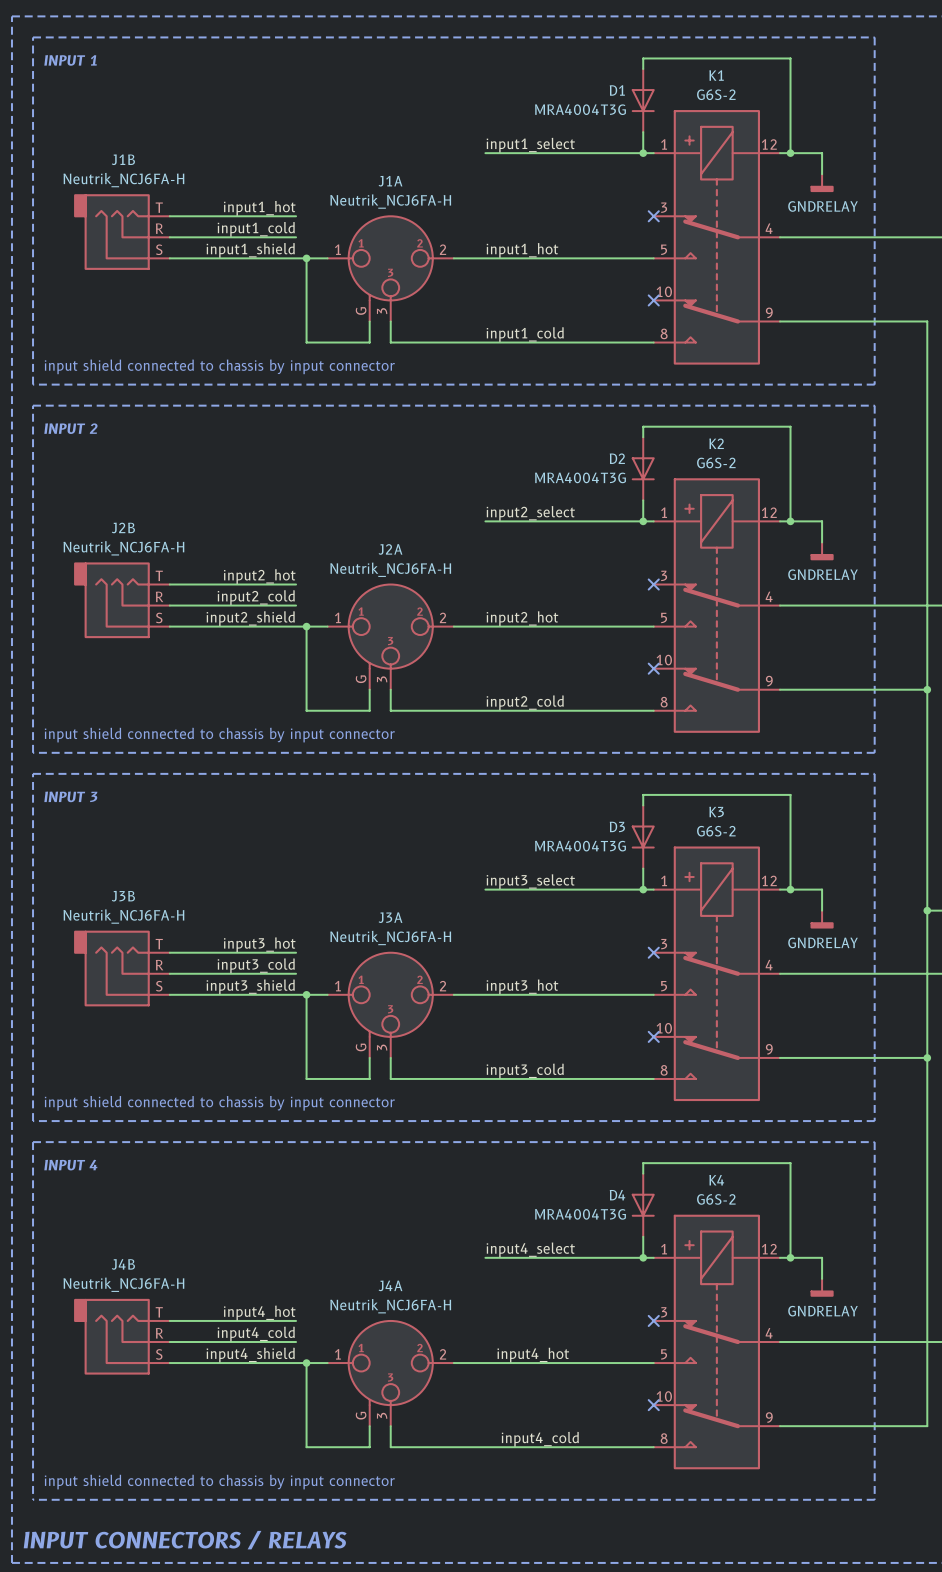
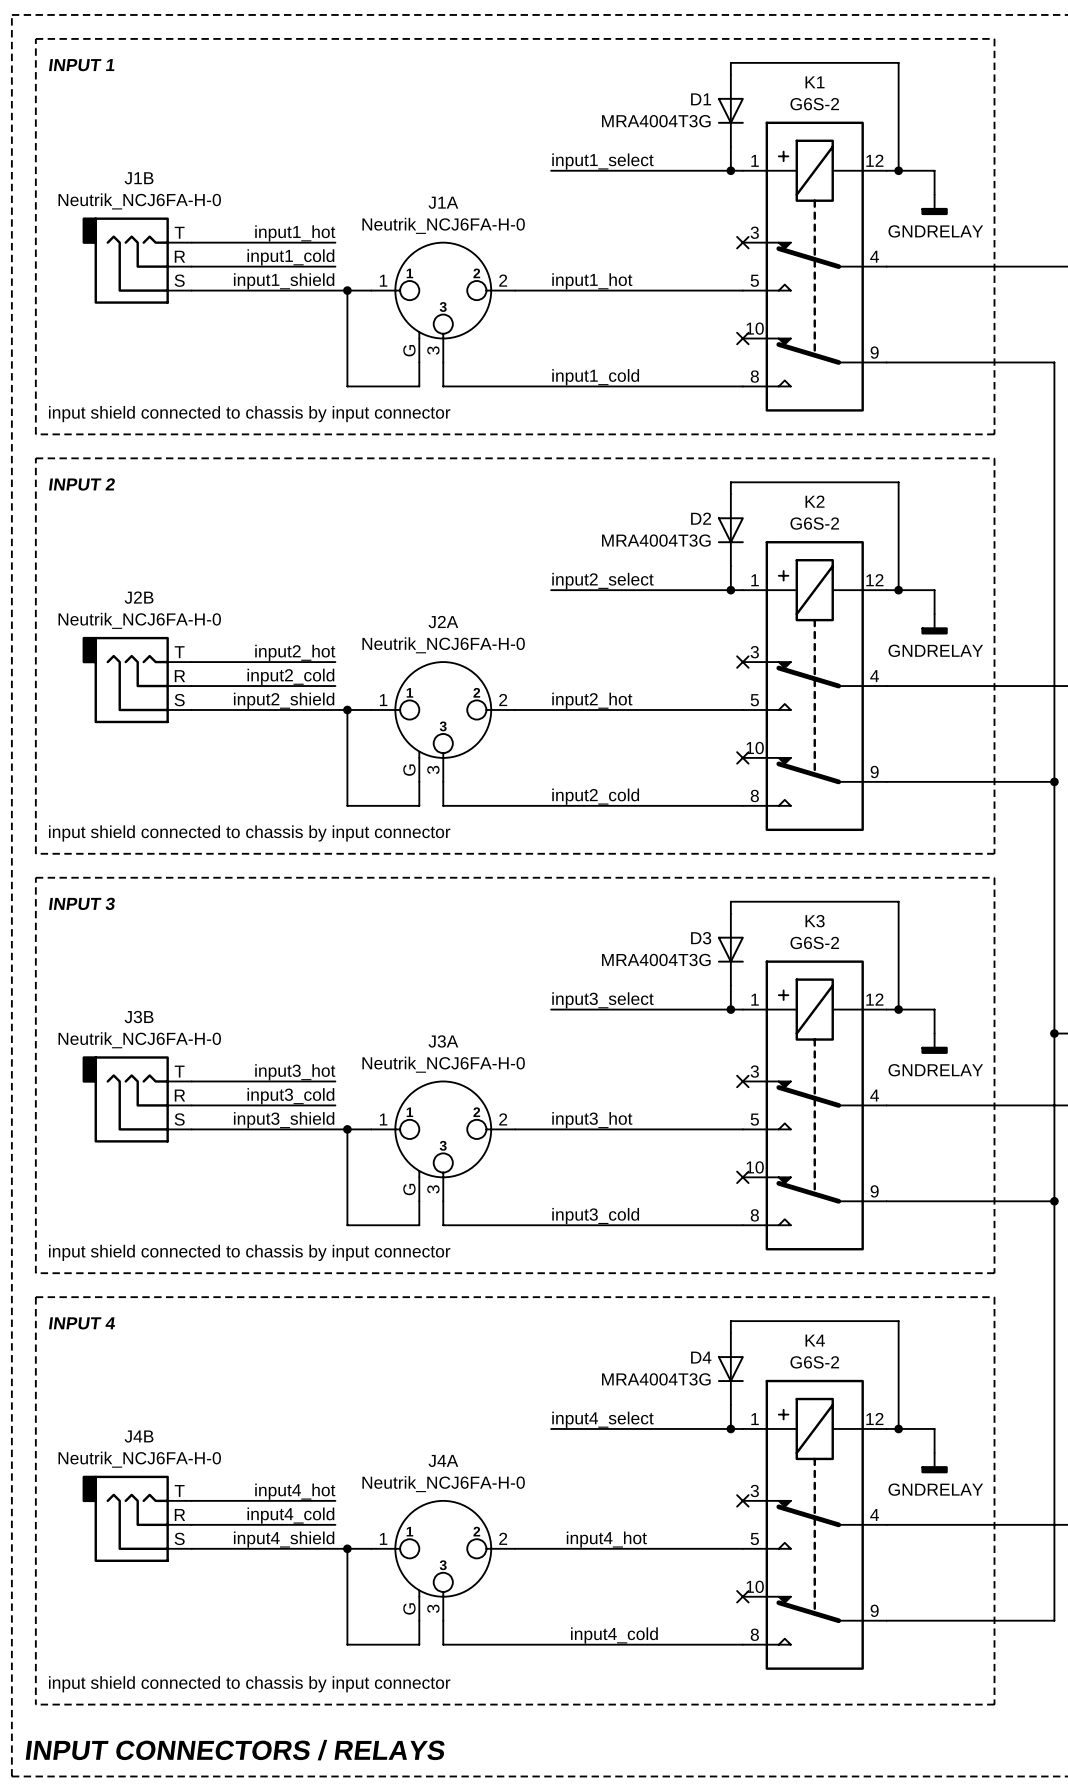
J1B value: Neutrik_NCJ6FA-H (123, 180) -> Neutrik_NCJ6FA-H-0 (139, 201)
J1A value: Neutrik_NCJ6FA-H (390, 201) -> Neutrik_NCJ6FA-H-0 (443, 225)
J2B value: Neutrik_NCJ6FA-H (123, 548) -> Neutrik_NCJ6FA-H-0 (139, 620)
J2A value: Neutrik_NCJ6FA-H (390, 569) -> Neutrik_NCJ6FA-H-0 (443, 645)
J3B value: Neutrik_NCJ6FA-H (123, 916) -> Neutrik_NCJ6FA-H-0 (139, 1040)
J3A value: Neutrik_NCJ6FA-H (390, 937) -> Neutrik_NCJ6FA-H-0 (443, 1064)
J4B value: Neutrik_NCJ6FA-H (123, 1284) -> Neutrik_NCJ6FA-H-0 (139, 1459)
J4A value: Neutrik_NCJ6FA-H (390, 1306) -> Neutrik_NCJ6FA-H-0 (443, 1484)

